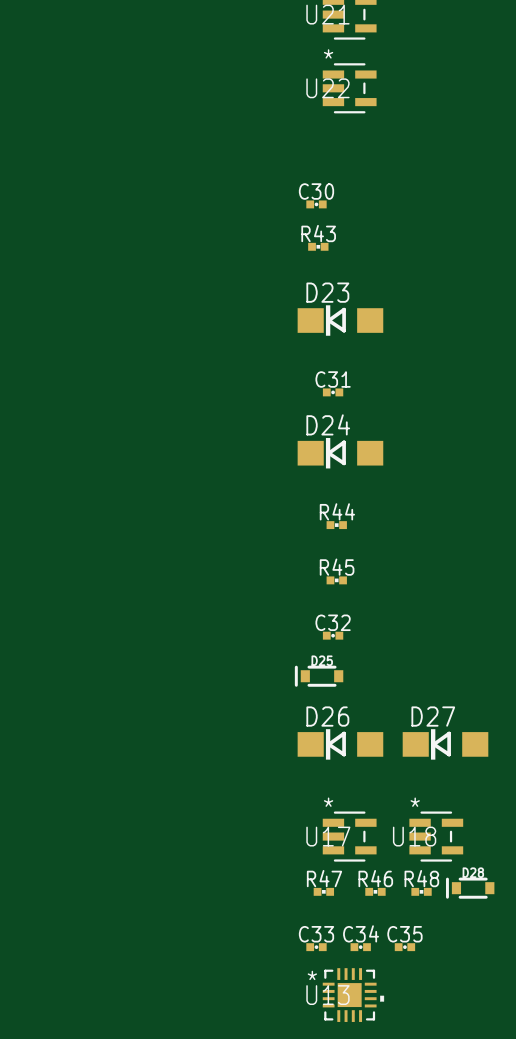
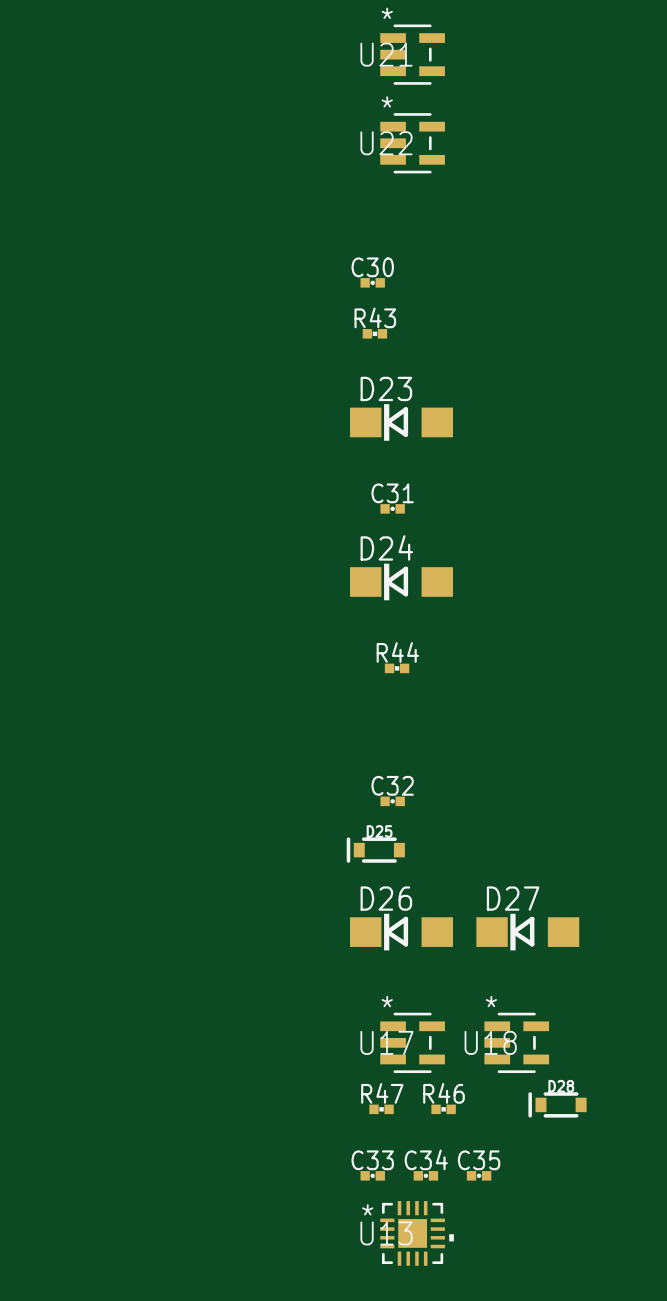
R45: (336, 580) -> none
R48: (421, 891) -> none

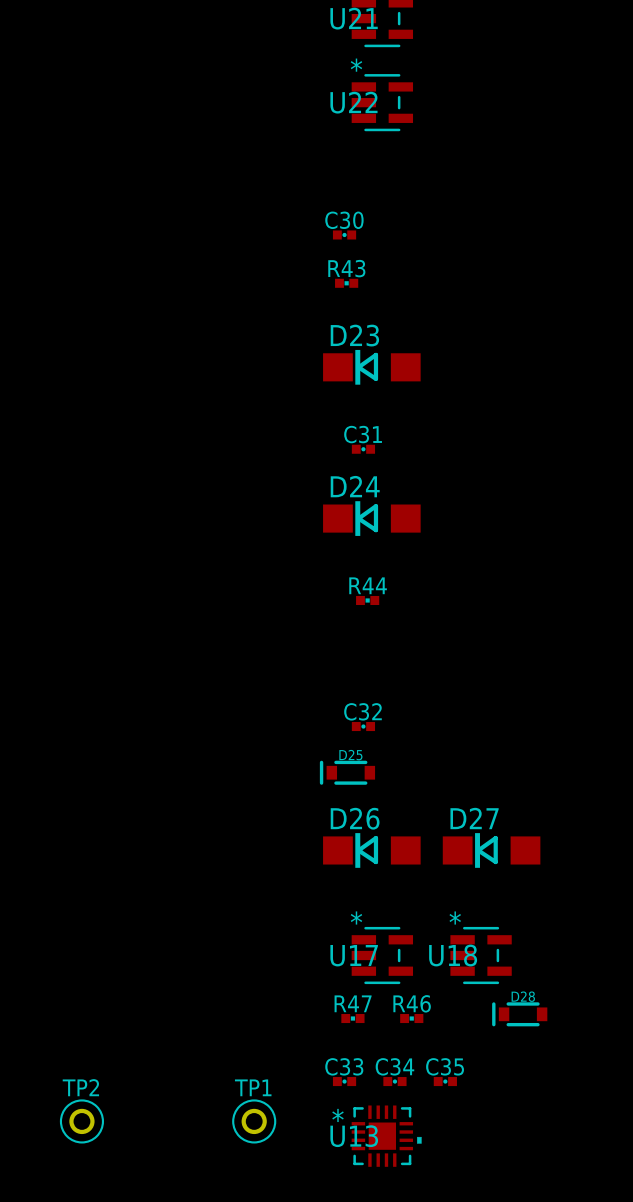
TP2: none -> (81, 1121)
TP1: none -> (254, 1121)

